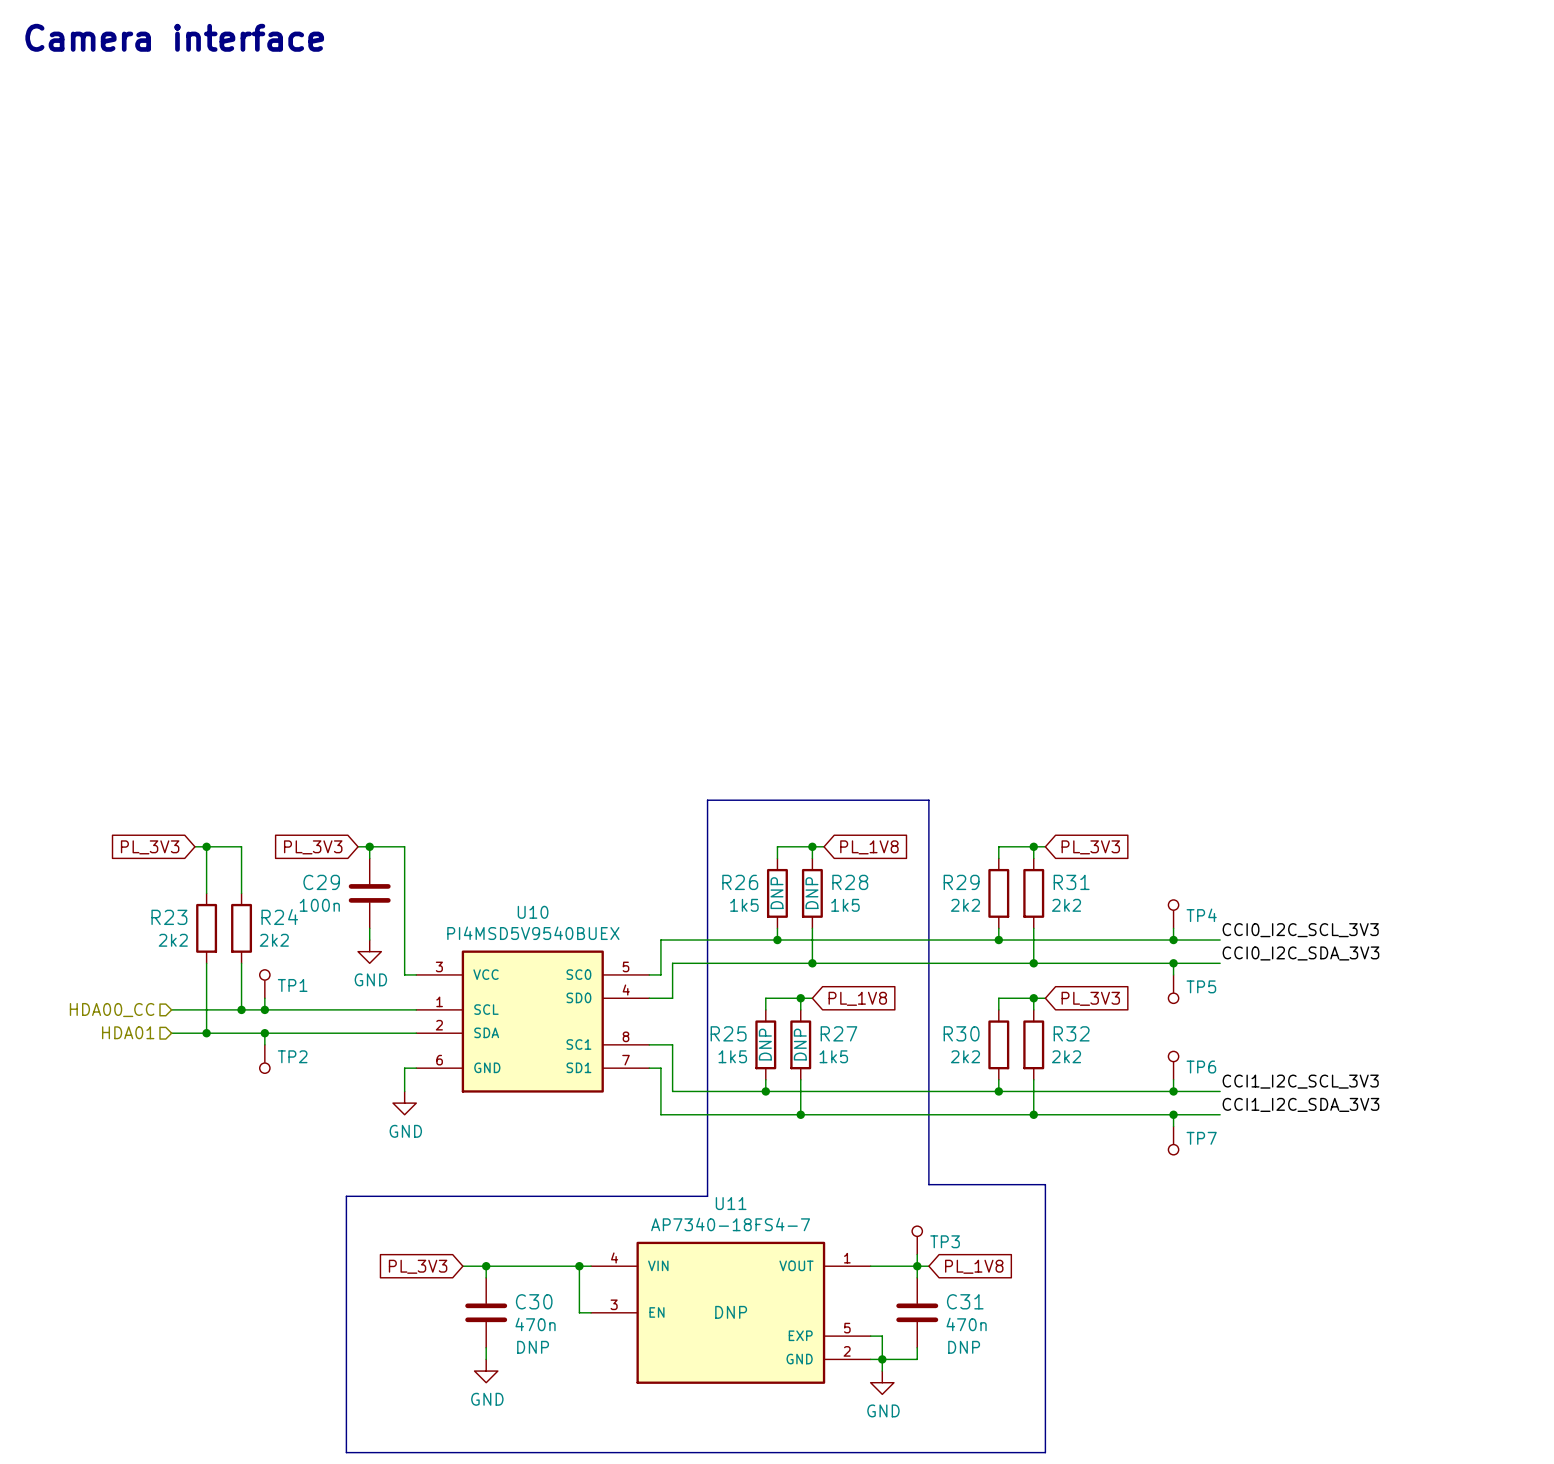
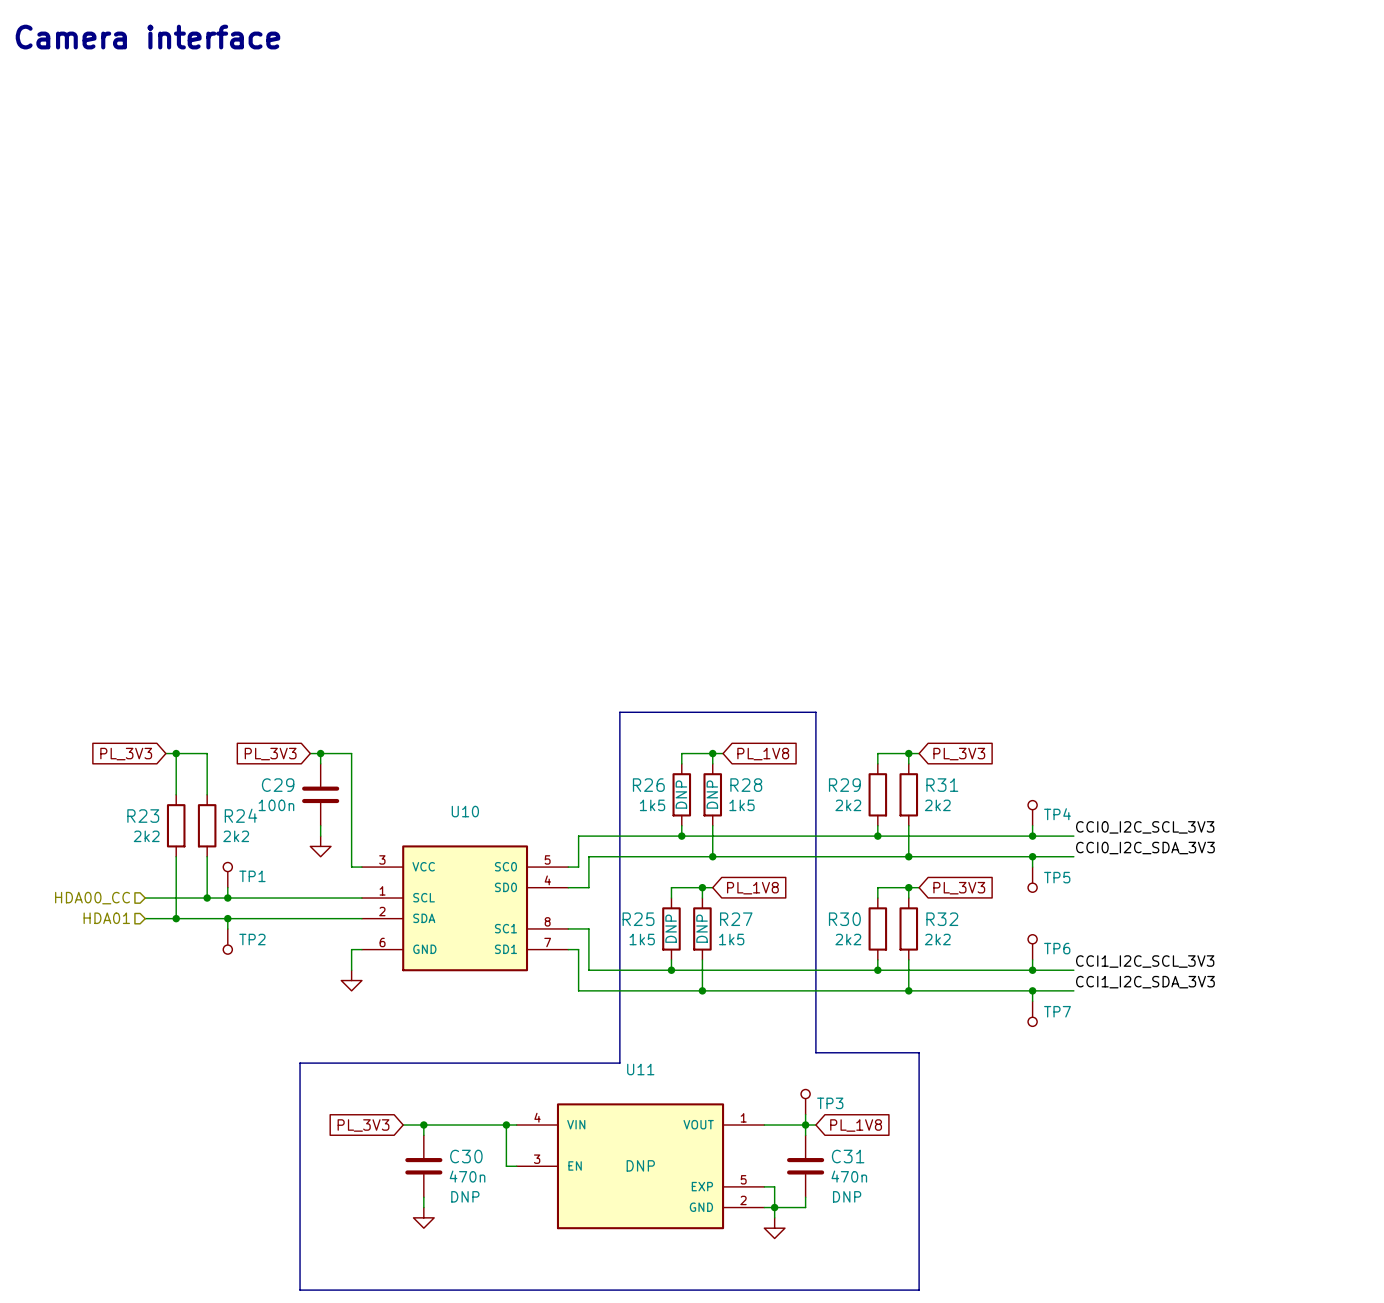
U10 value: PI4MSD5V9540BUEX (533, 933) -> none
power symbol text: GND (370, 979) -> none
power symbol text: GND (405, 1131) -> none
U11 value: AP7340-18FS4-7 (730, 1224) -> none
power symbol text: GND (487, 1399) -> none
power symbol text: GND (883, 1410) -> none

